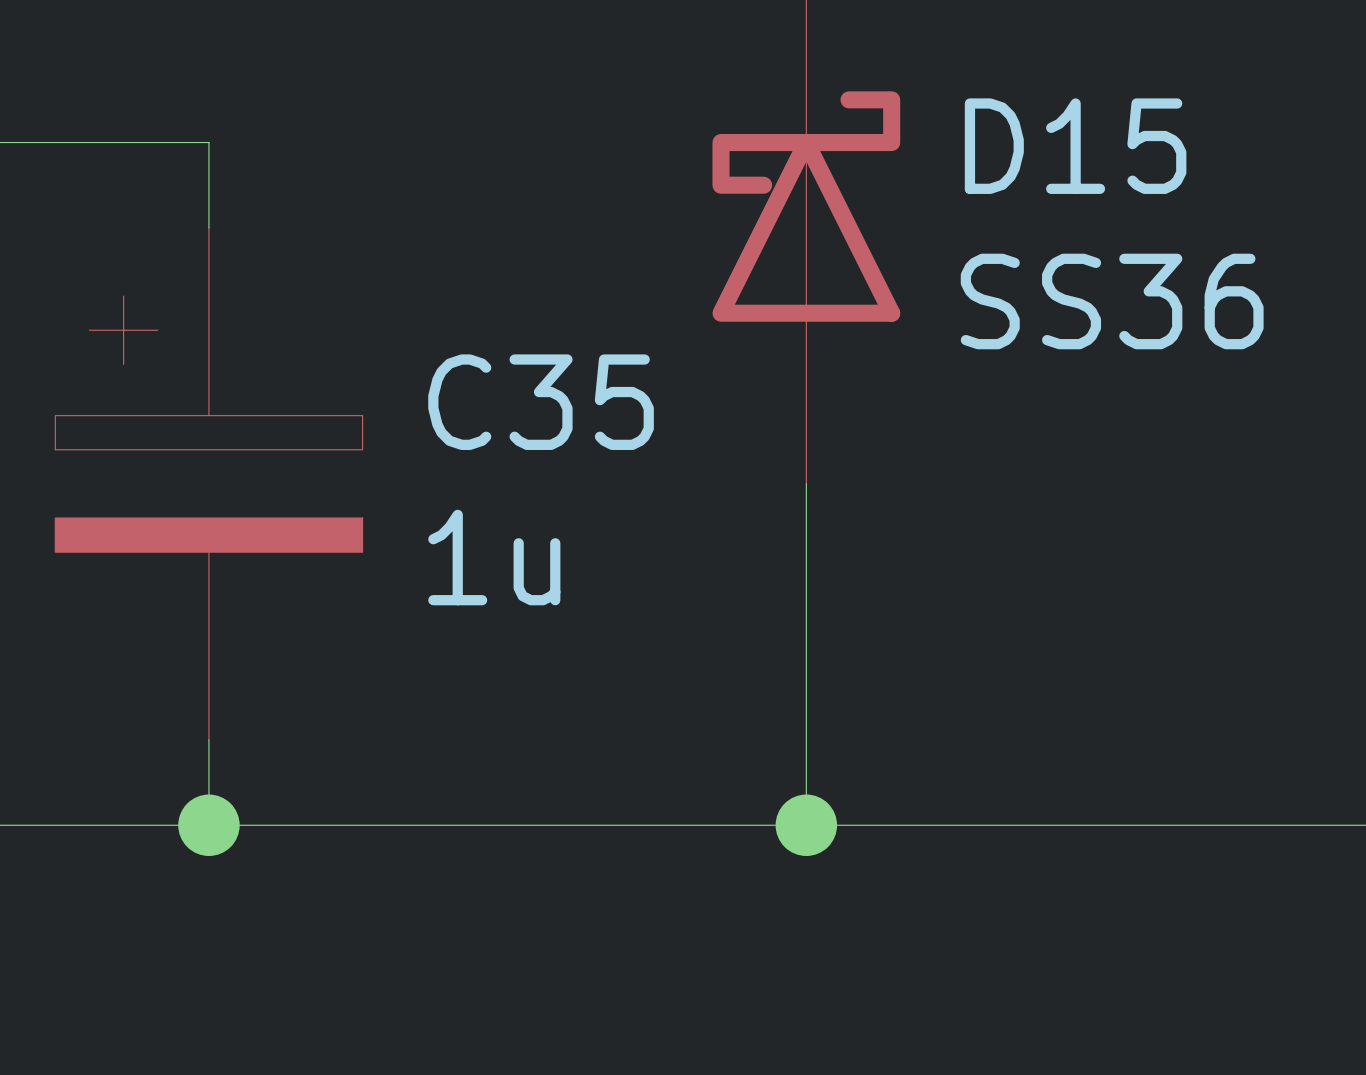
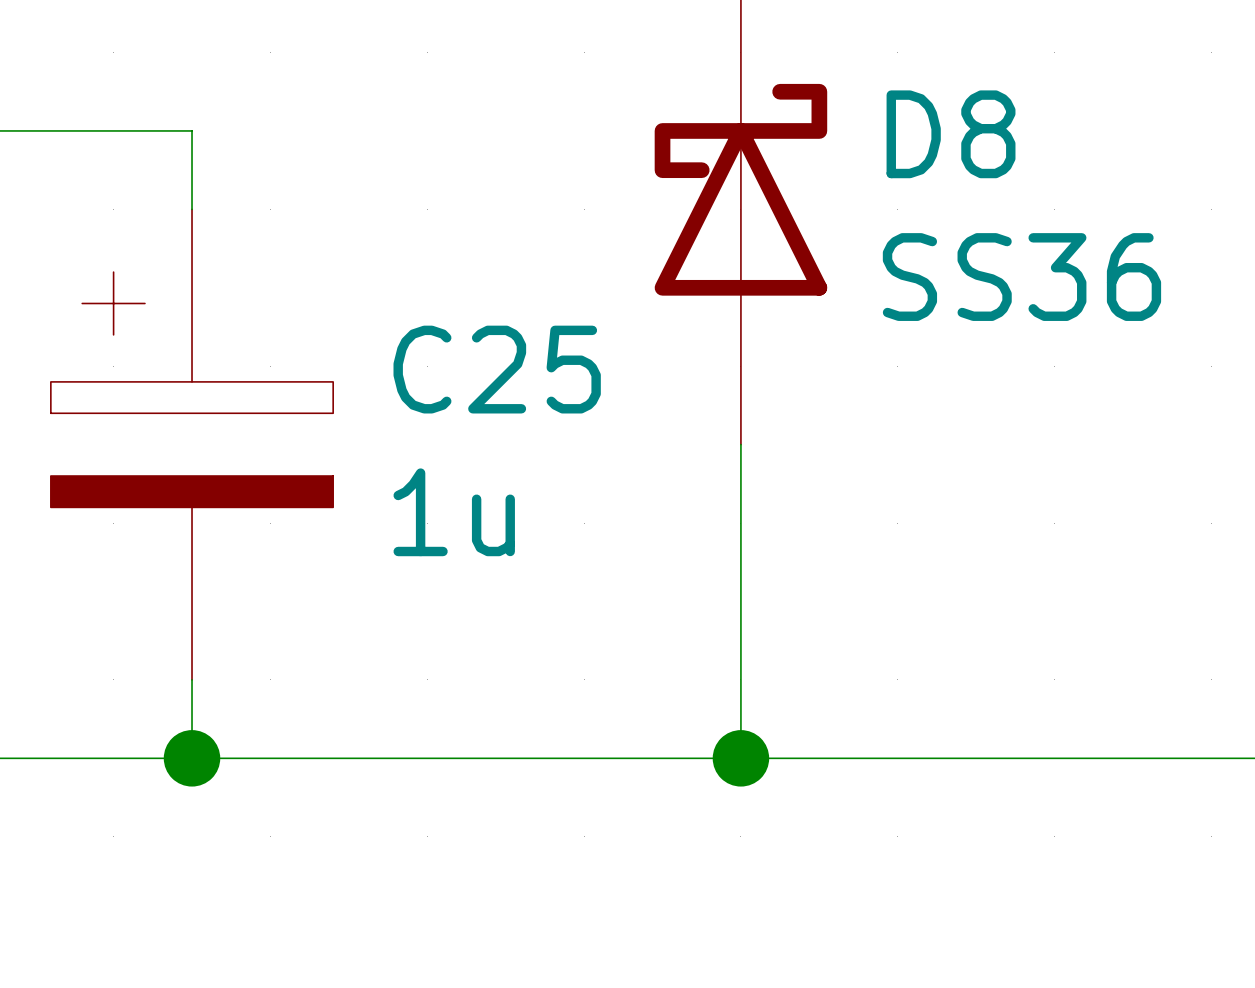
D15 name: D15 (1075, 146) -> D8 (951, 134)
C35 name: C35 (541, 402) -> C25 (497, 369)

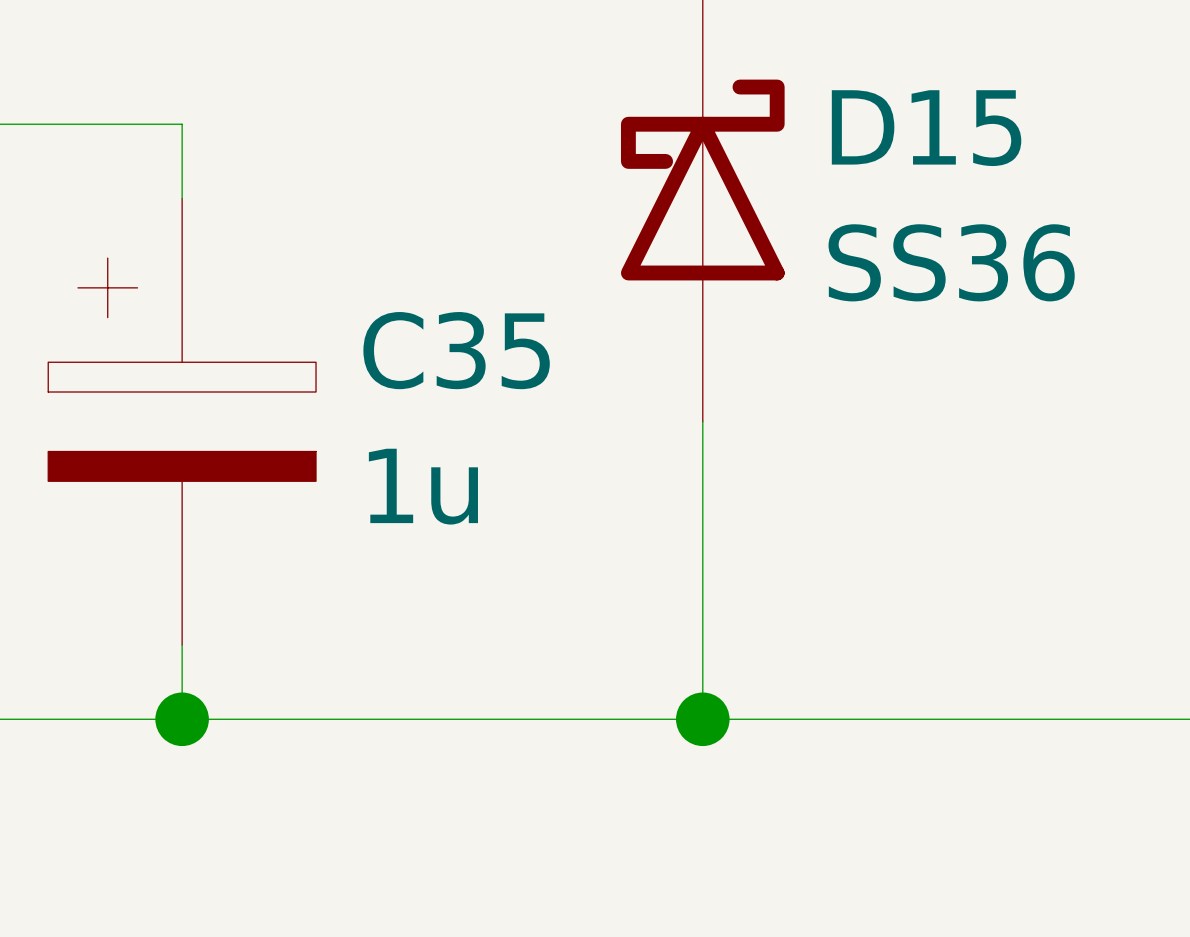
D8 name: D8 (951, 134) -> D15 (926, 128)
C25 name: C25 (497, 369) -> C35 (456, 350)

